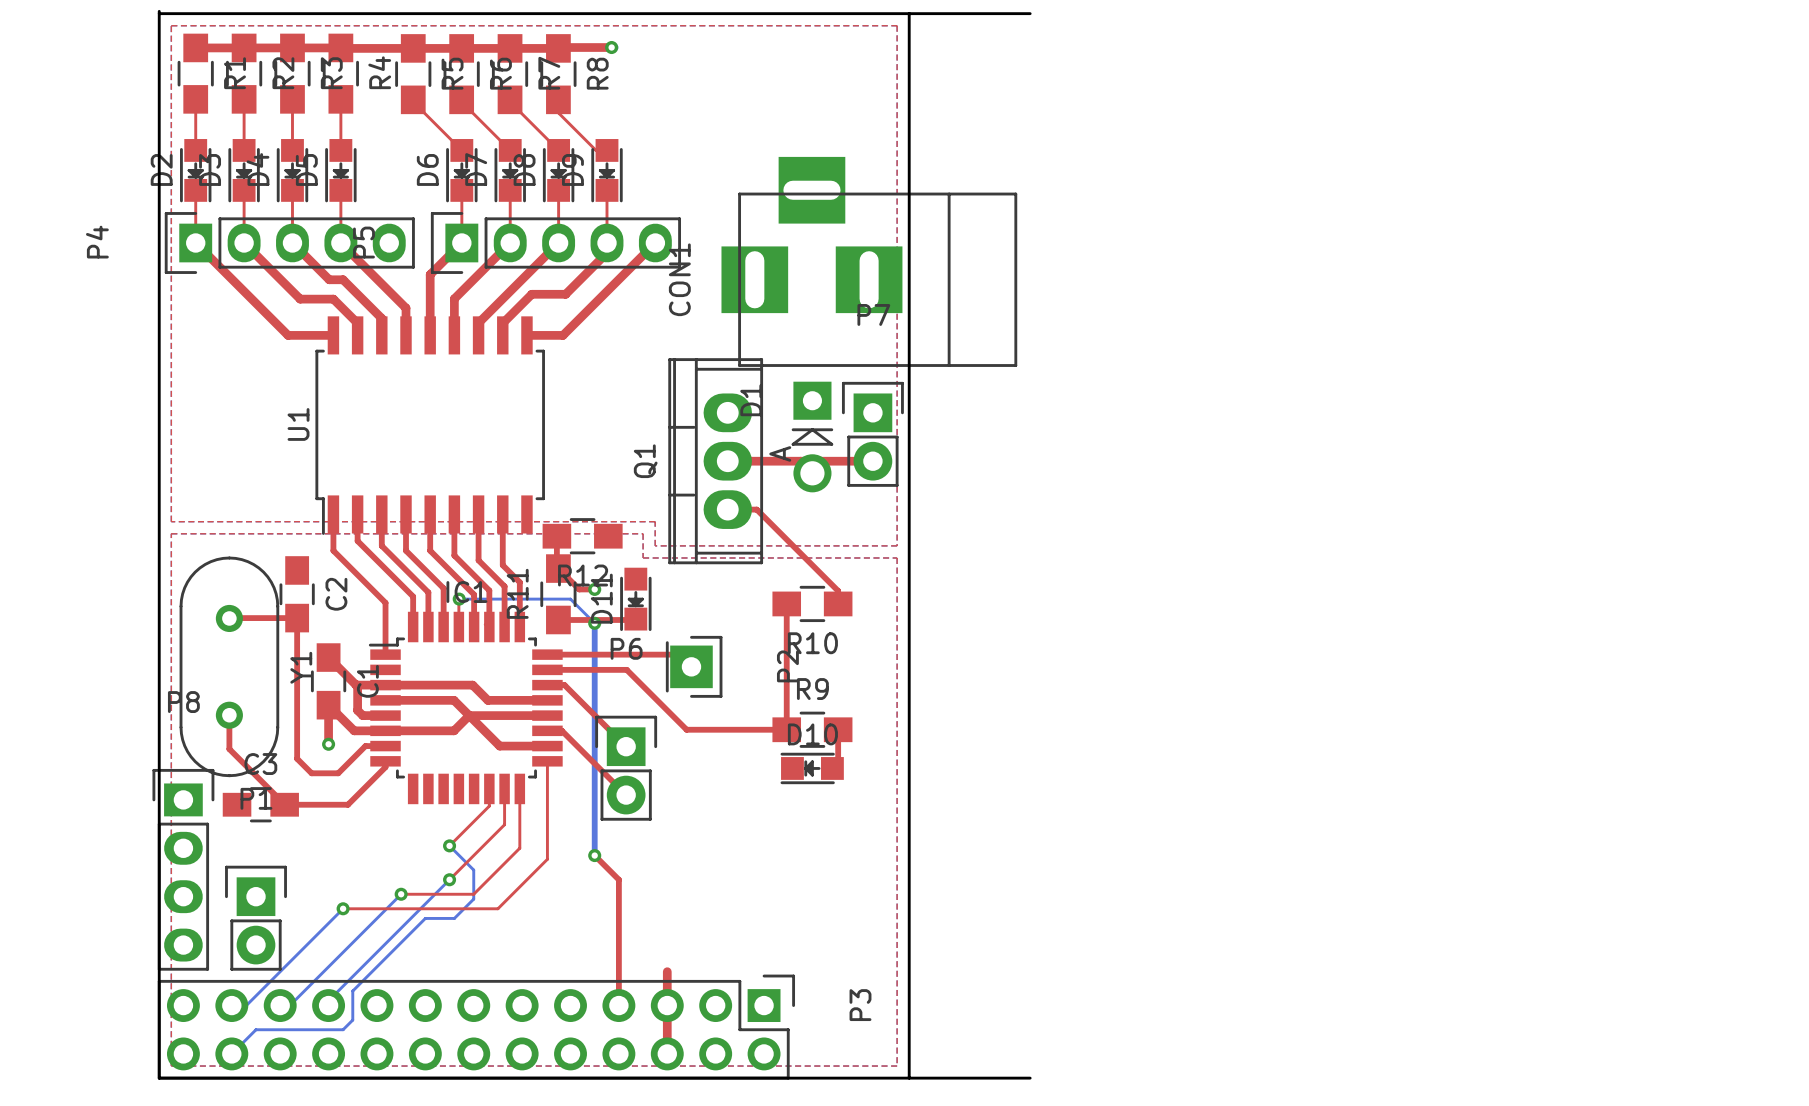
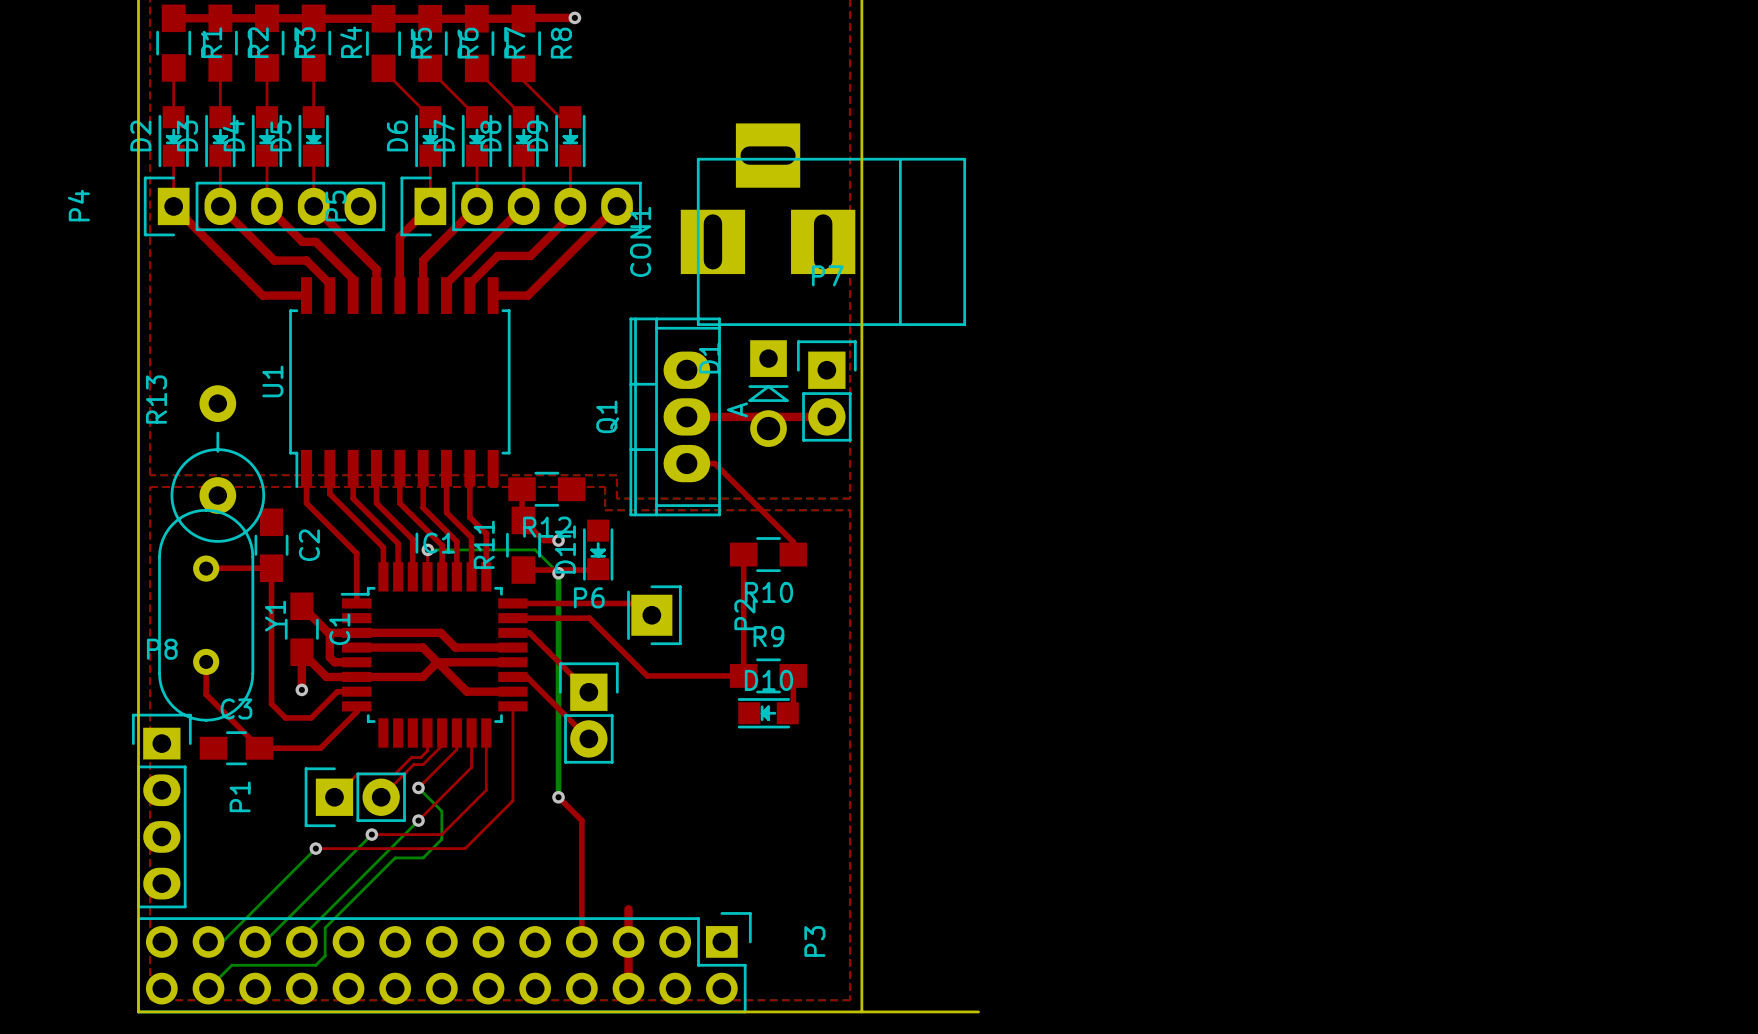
R13: none -> (217, 464)
top track: none -> (427, 733) (427, 750) (420, 757) (411, 757) (395, 773) (357, 773) (334, 797)
top track: none -> (442, 733) (442, 745) (423, 764) (413, 764) (381, 797)
P1 rotation: 0° (256, 918) -> 90° counterclockwise (355, 797)
P1 position: (256, 918) -> (355, 797)

